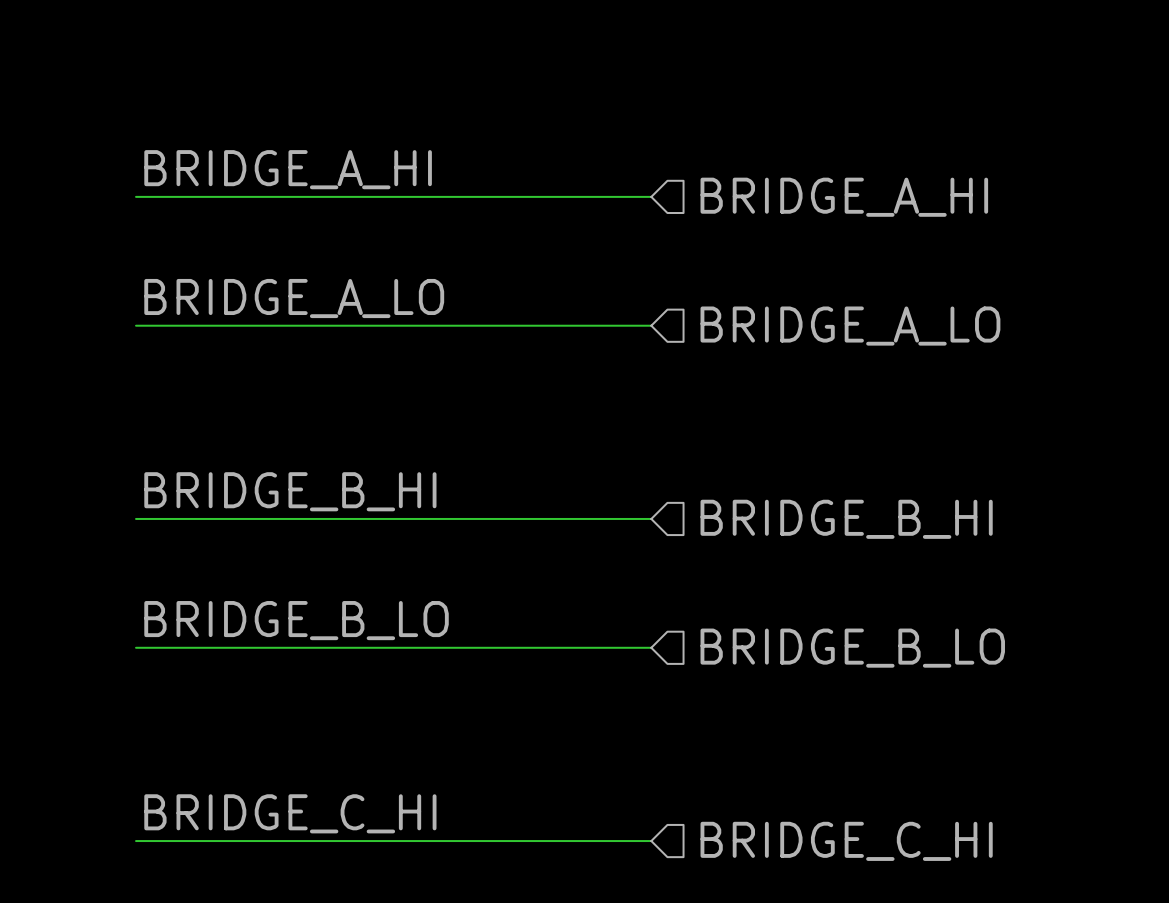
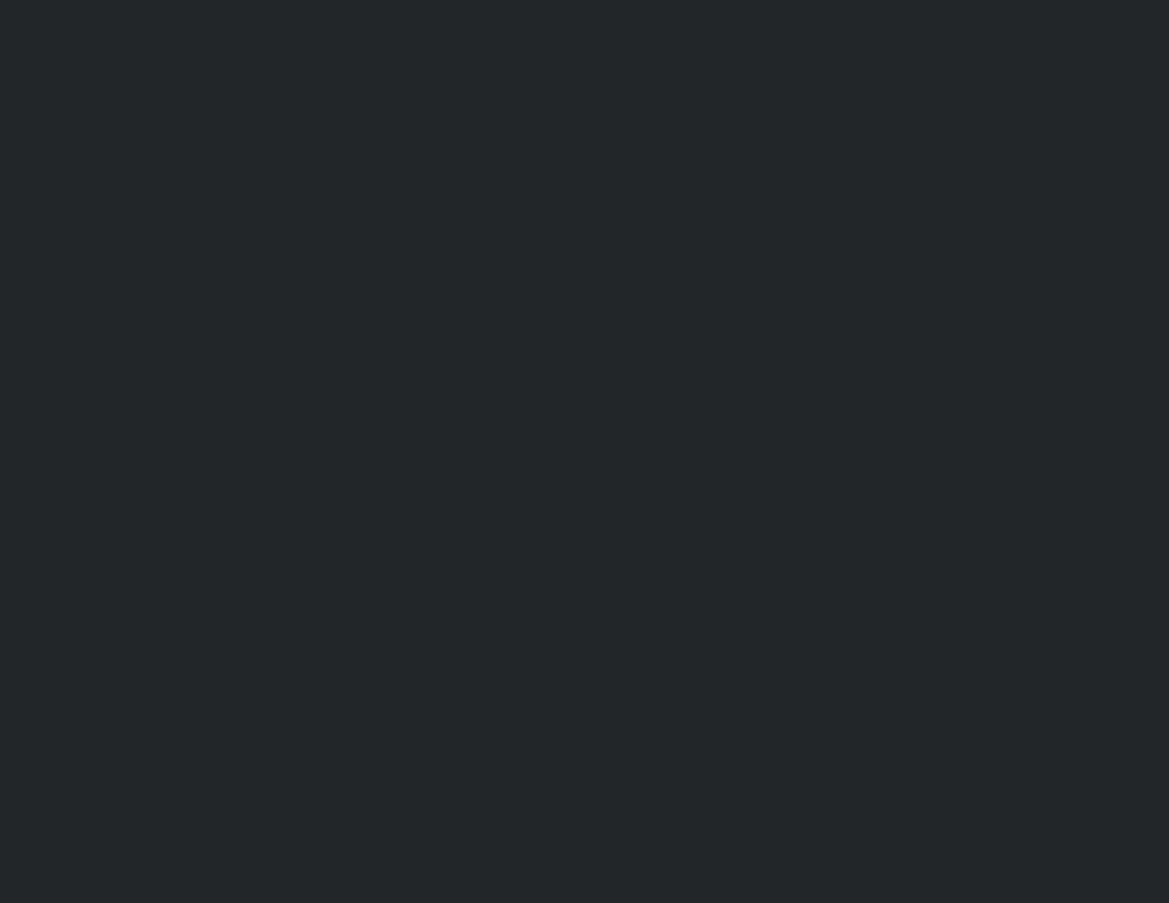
label: BRIDGE_A_HI (288, 169) -> none
wire: (136, 196) (651, 196) -> none
hierarchical label: BRIDGE_A_HI (844, 197) -> none
label: BRIDGE_A_LO (294, 298) -> none
wire: (136, 325) (651, 325) -> none
hierarchical label: BRIDGE_A_LO (850, 326) -> none
label: BRIDGE_B_HI (290, 491) -> none
wire: (136, 518) (651, 518) -> none
hierarchical label: BRIDGE_B_HI (846, 519) -> none
label: BRIDGE_B_LO (296, 620) -> none
wire: (136, 647) (651, 647) -> none
hierarchical label: BRIDGE_B_LO (852, 648) -> none
label: BRIDGE_C_HI (290, 813) -> none
wire: (136, 841) (651, 841) -> none
hierarchical label: BRIDGE_C_HI (846, 841) -> none

